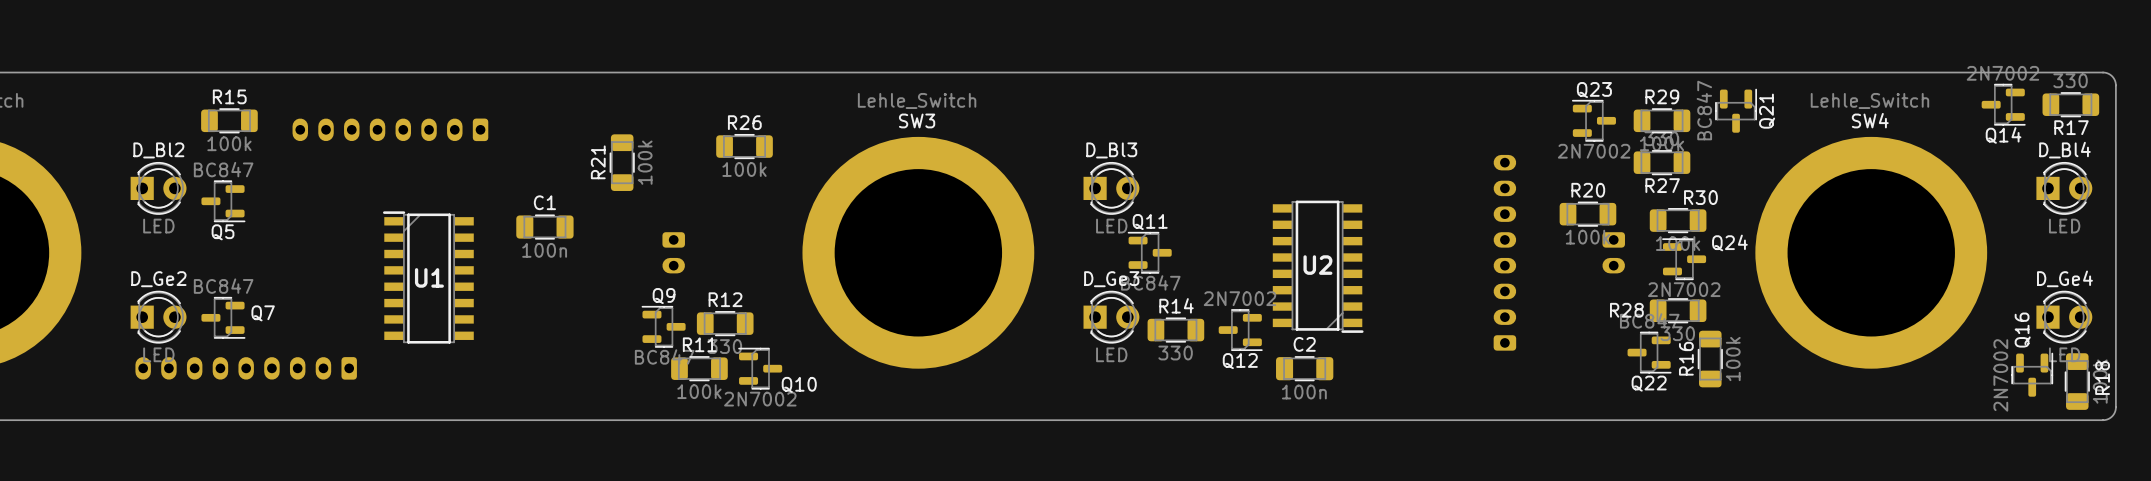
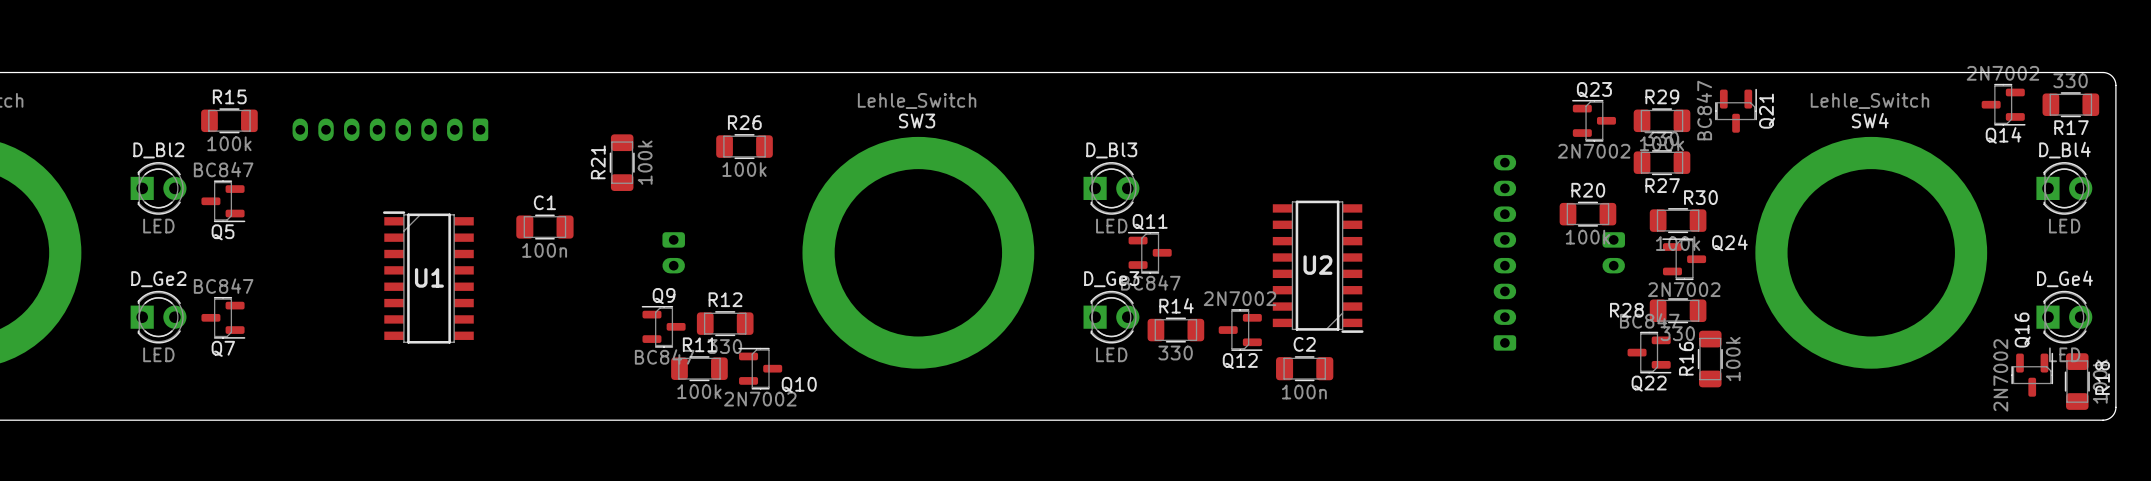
Q7 name position: Q7 (263, 313) -> Q7 (223, 348)
part: (246, 368) -> none

